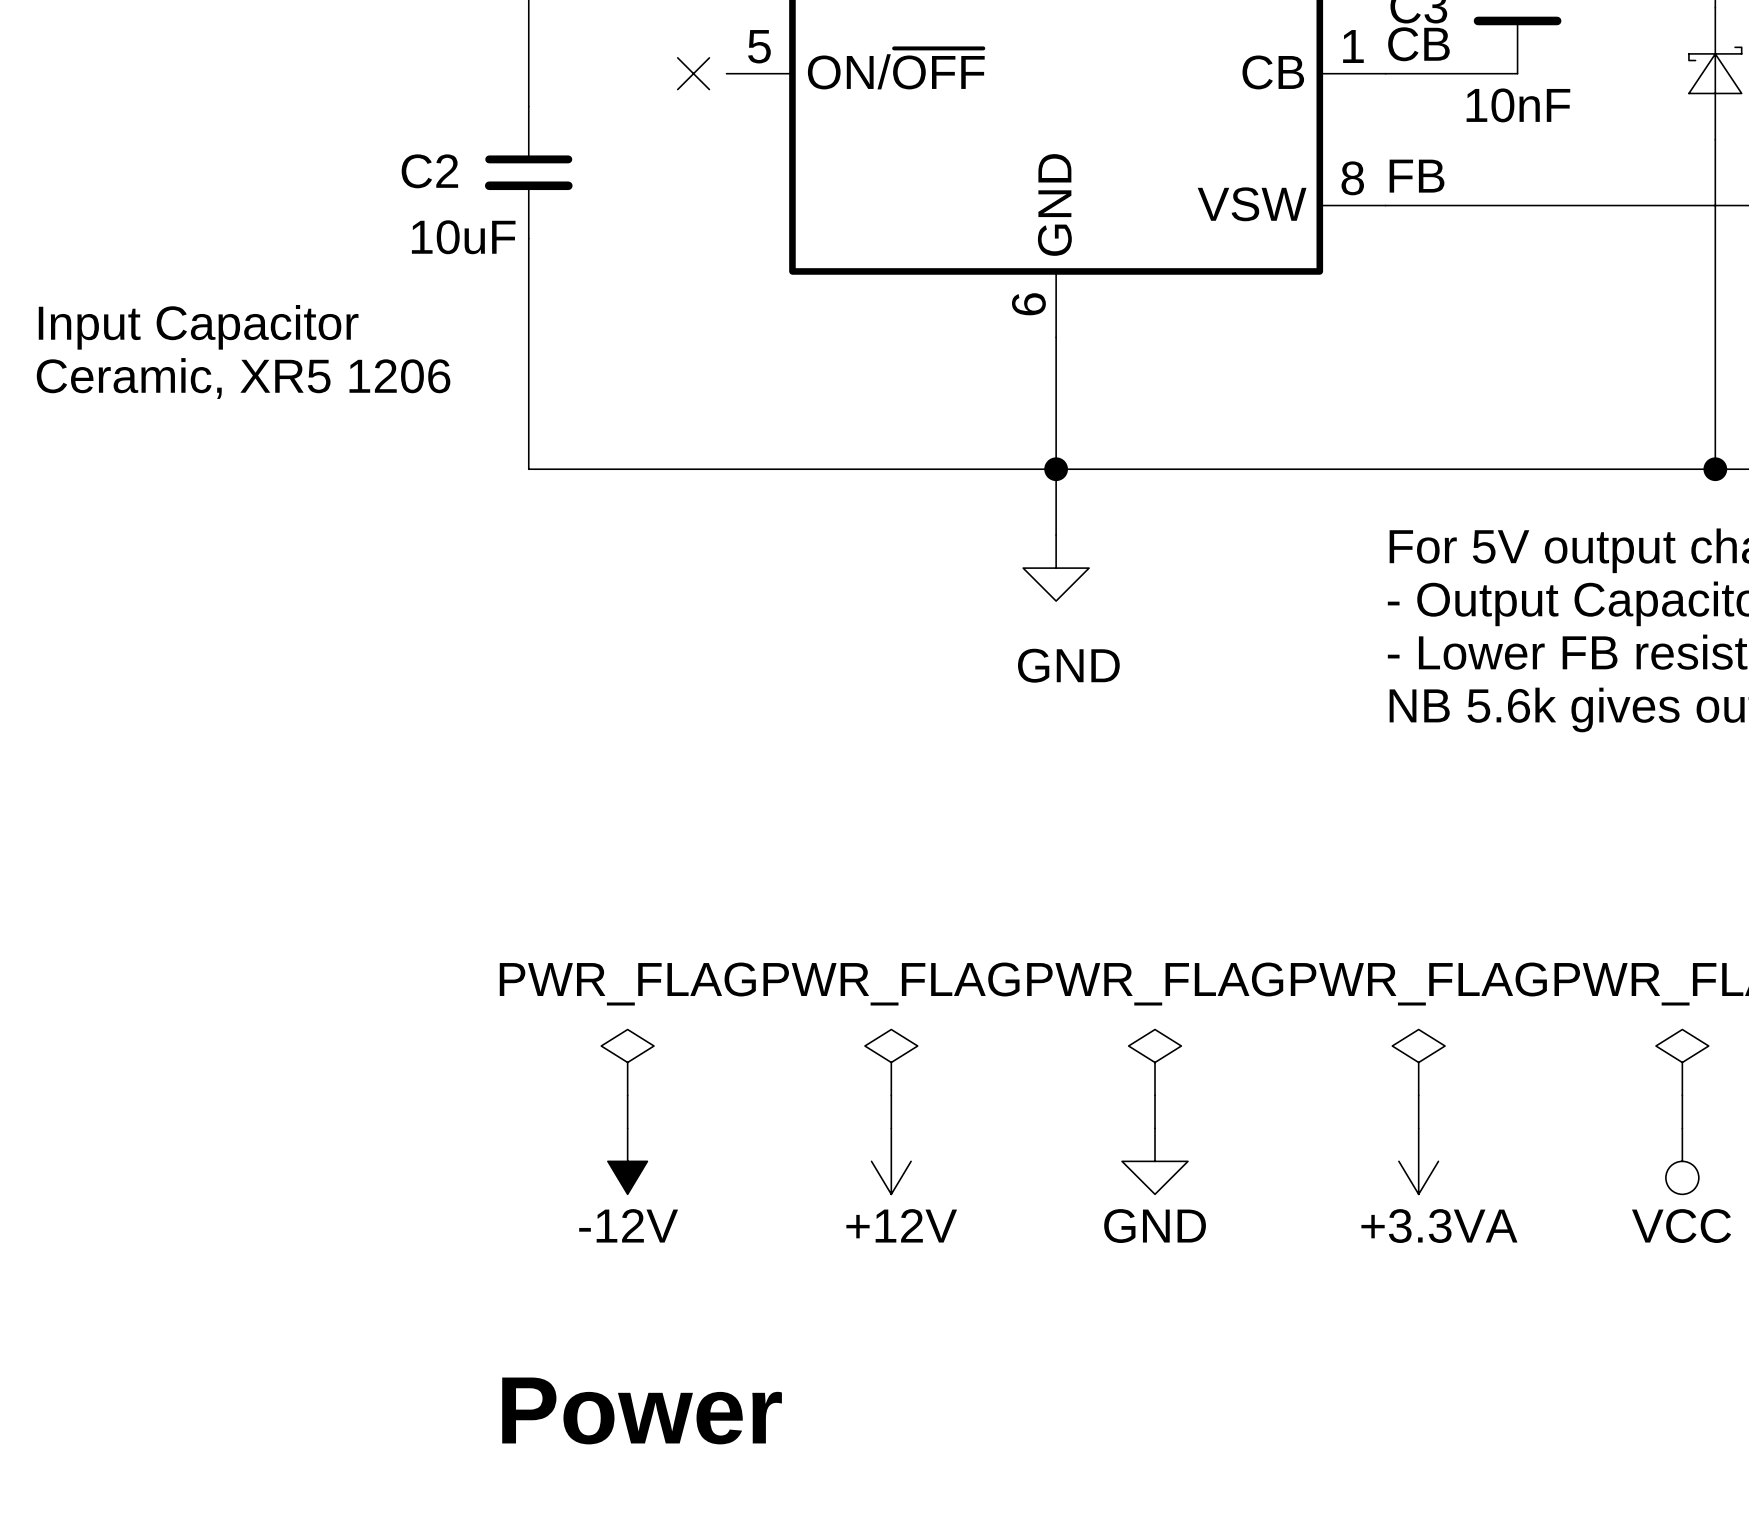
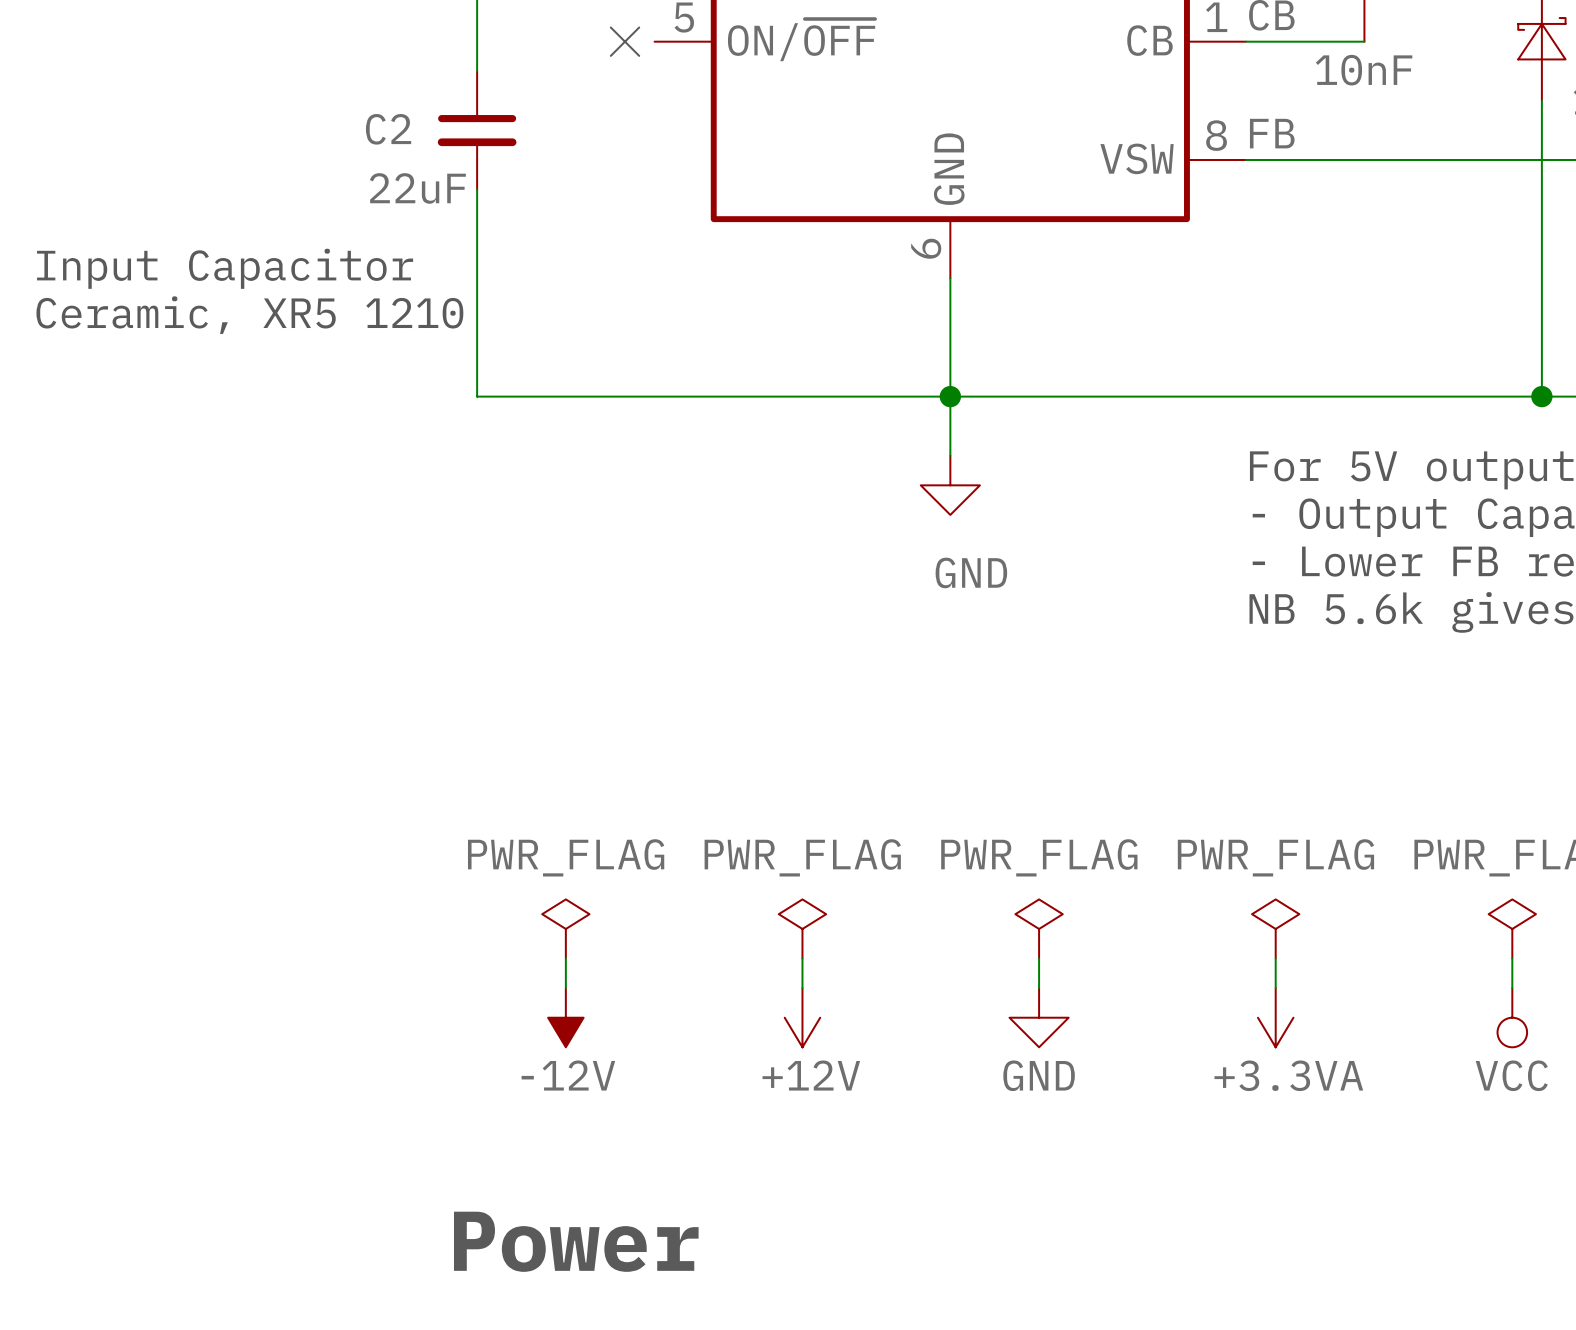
C2 value: 10uF (463, 237) -> 22uF (417, 188)
text: Ceramic, XR5 1206 (243, 378) -> Ceramic, XR5 1210 (249, 315)

